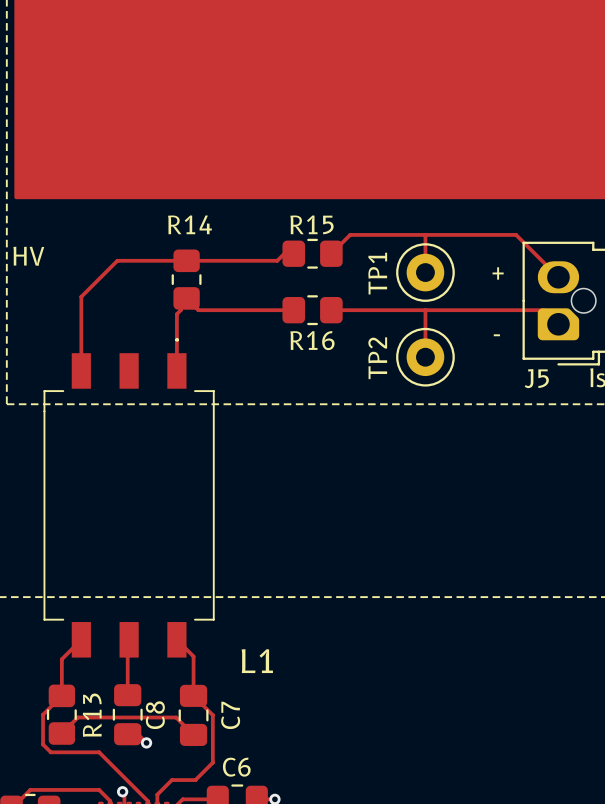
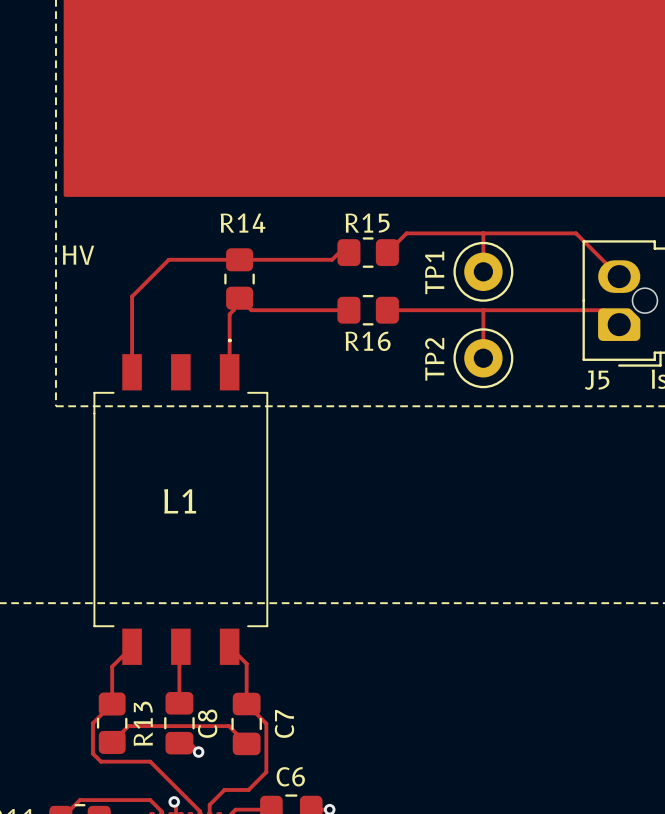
text: + (498, 273) -> none
text: - (496, 335) -> none
L1 name position: L1 (257, 661) -> L1 (180, 501)

